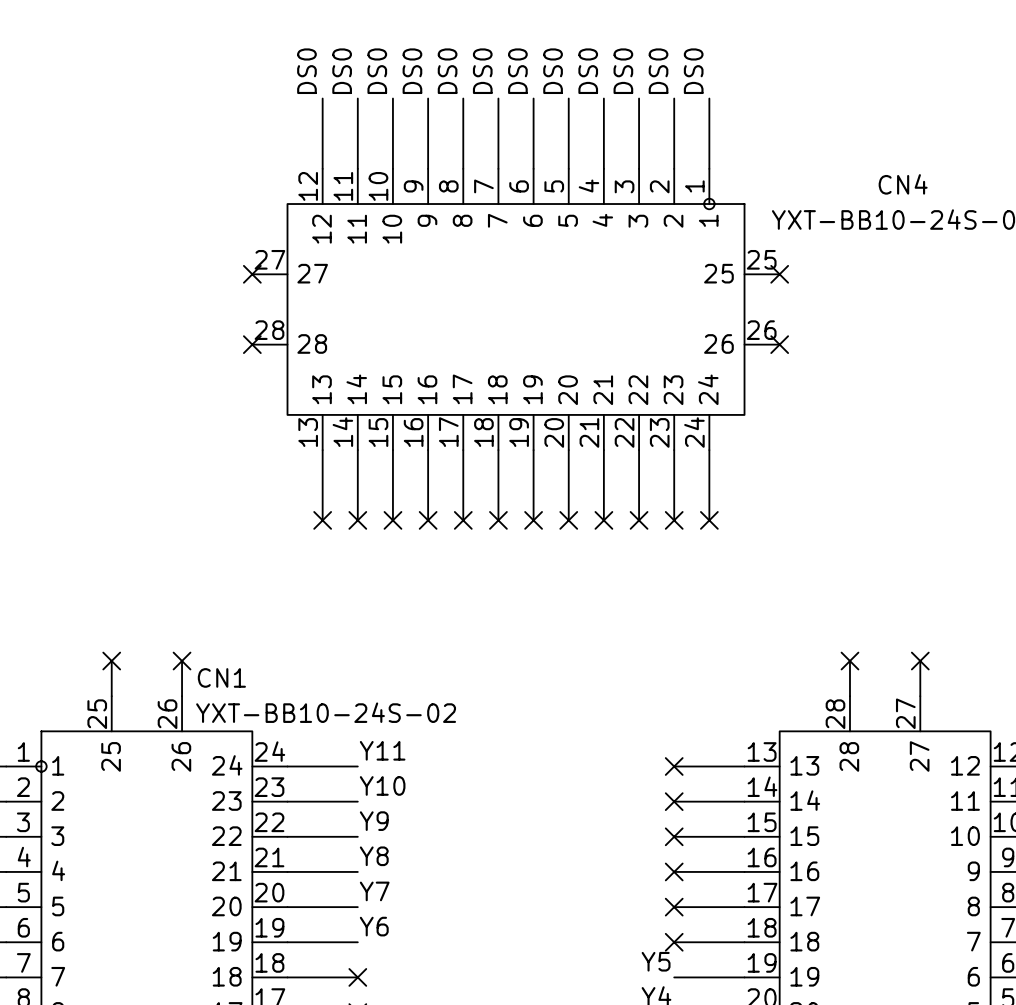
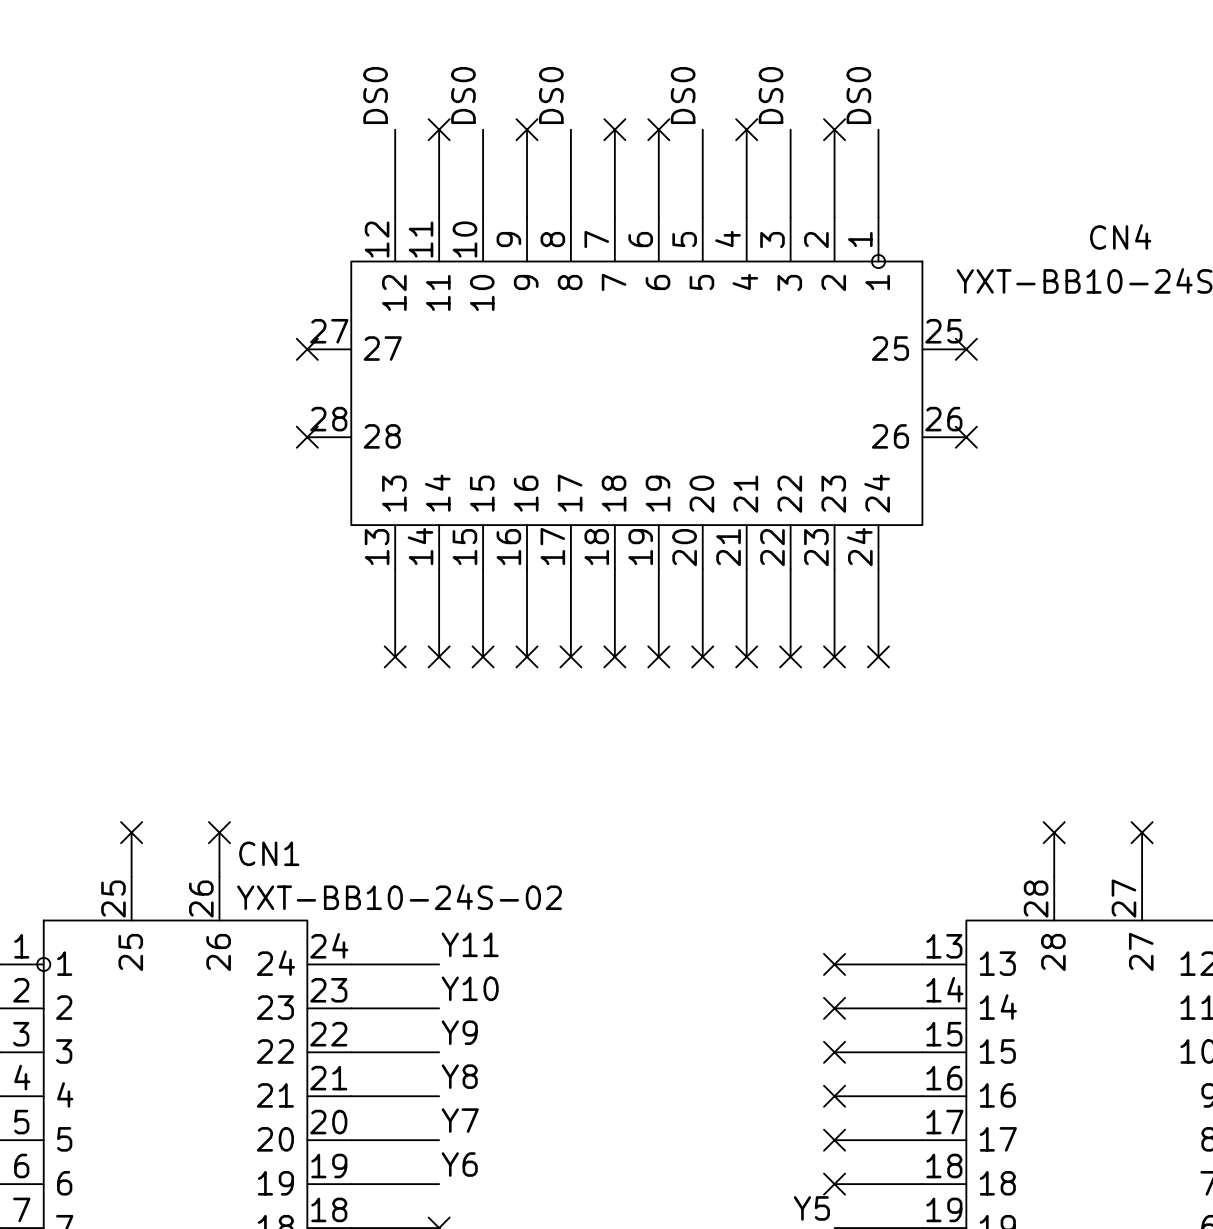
label: DS0 (342, 71) -> none
label: DS0 (412, 71) -> none
label: DS0 (482, 71) -> none
label: DS0 (517, 71) -> none
label: DS0 (588, 71) -> none
label: DS0 (658, 71) -> none
no-connect mark: none -> (439, 129)
no-connect mark: none -> (527, 129)
no-connect mark: none -> (614, 129)
no-connect mark: none -> (658, 129)
no-connect mark: none -> (746, 129)
no-connect mark: none -> (834, 129)

